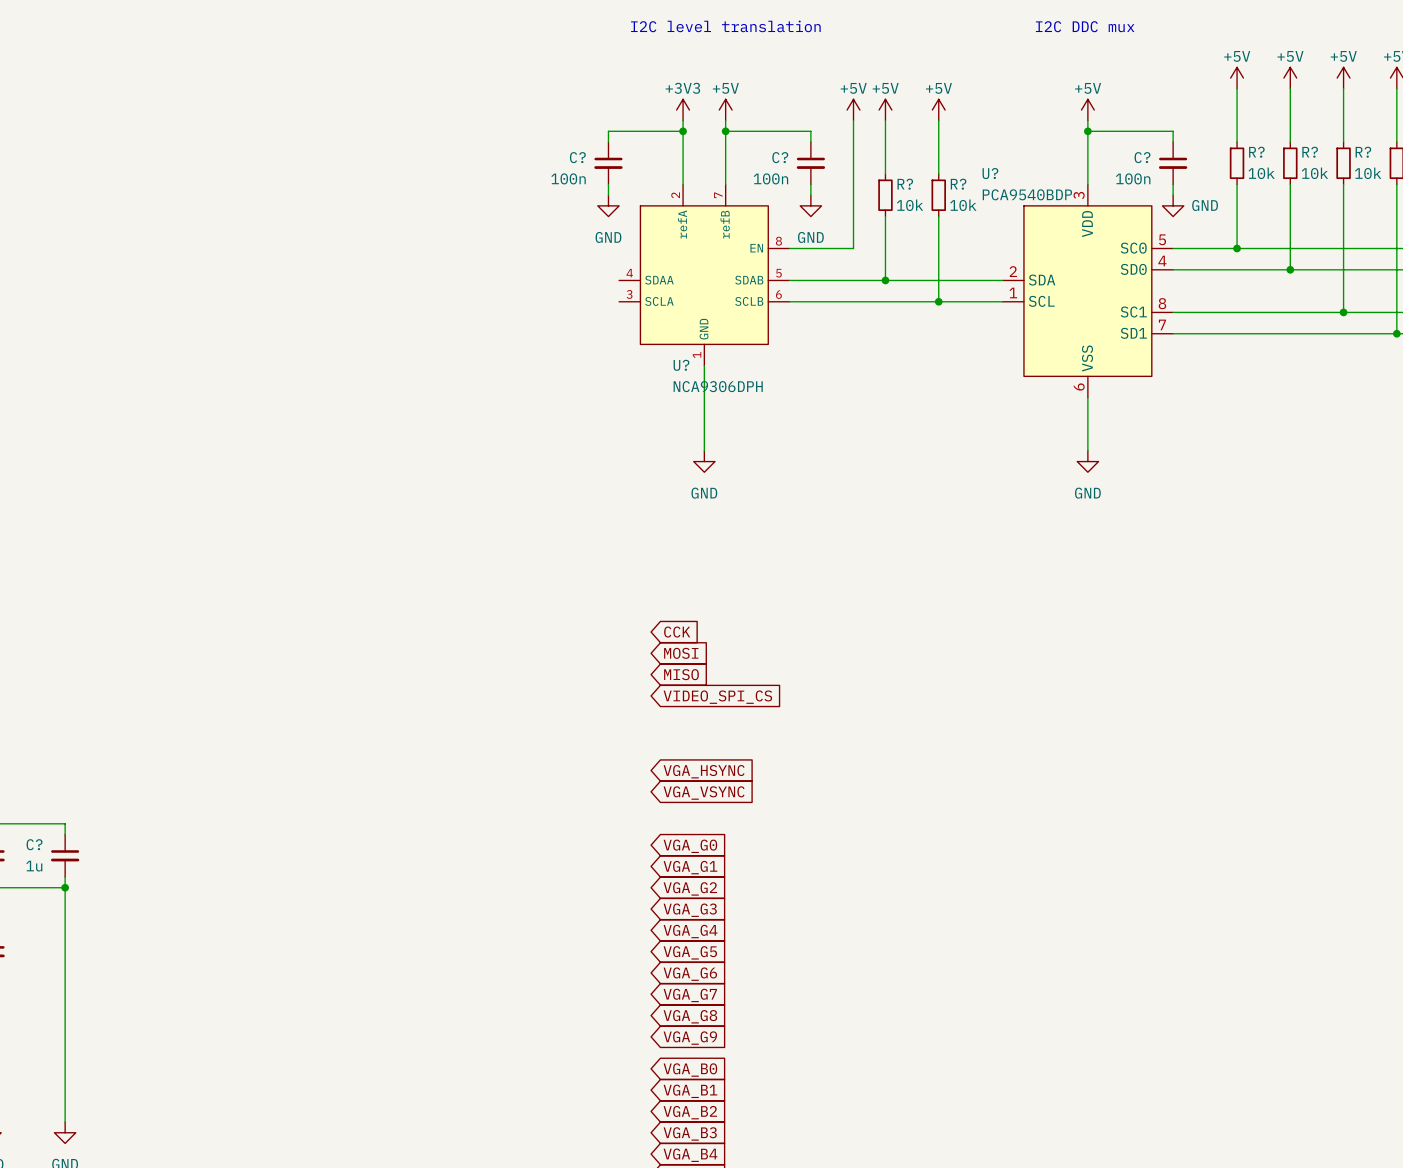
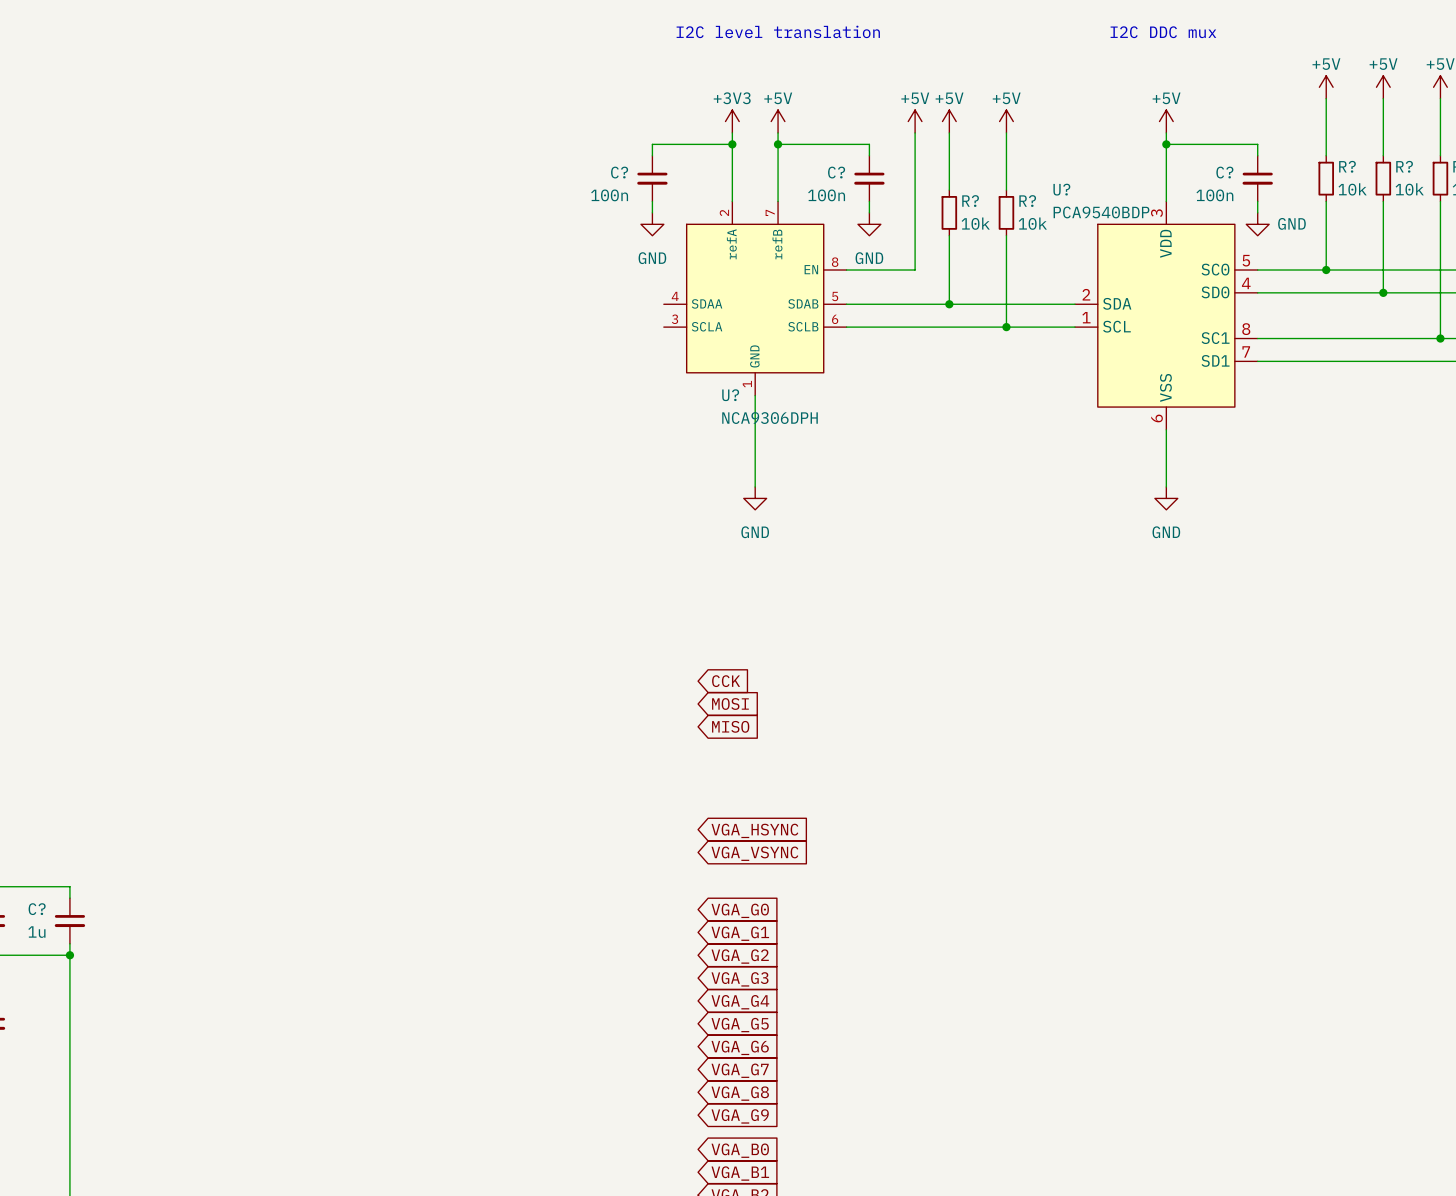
global label: VIDEO_SPI_CS (717, 697) -> none

